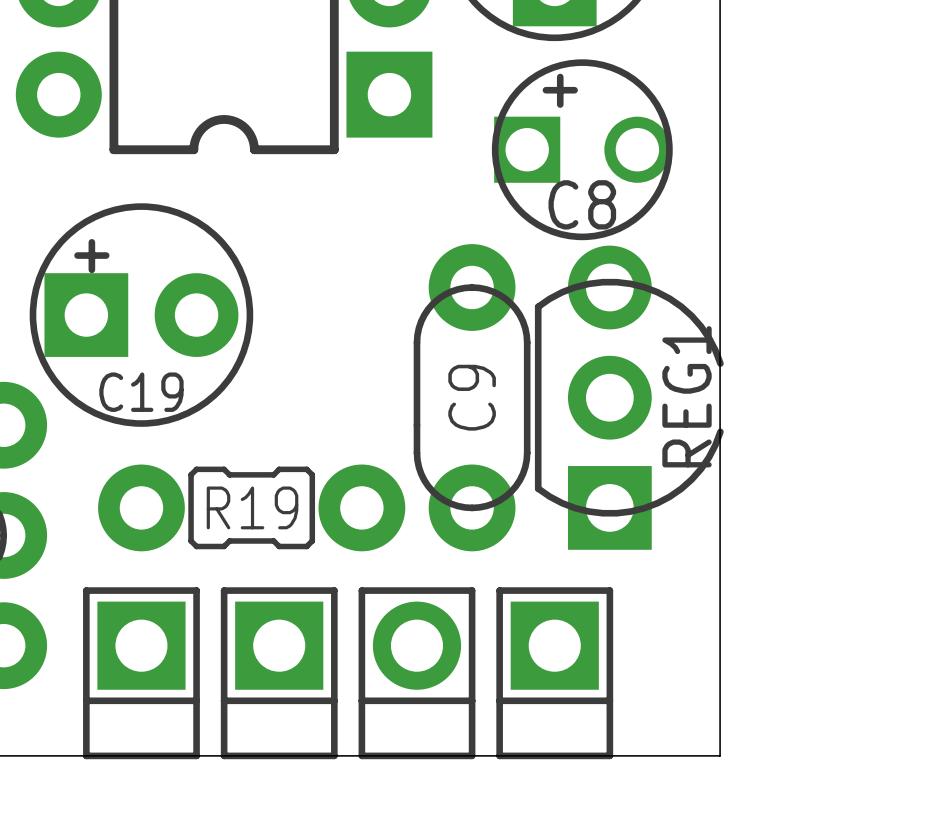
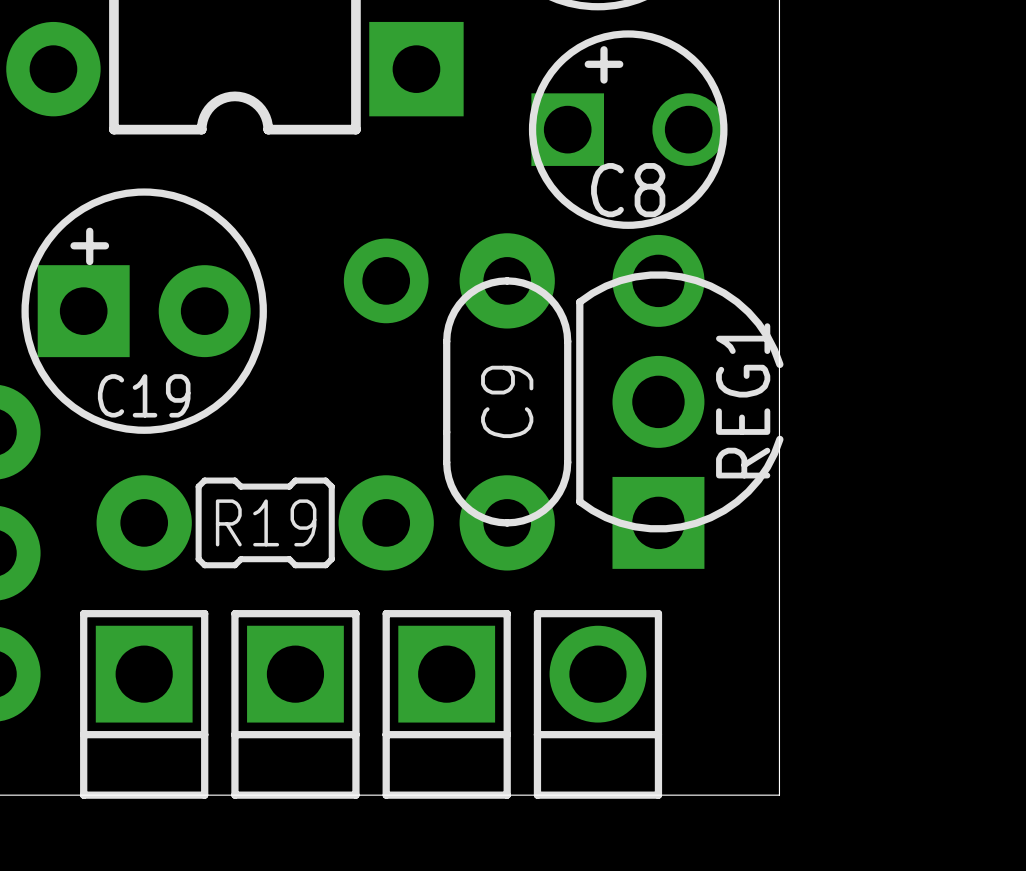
part: none -> (386, 280)
part footprint: [358, 587, 476, 760] -> [382, 610, 511, 799]
part footprint: [496, 587, 614, 760] -> [533, 610, 663, 799]

